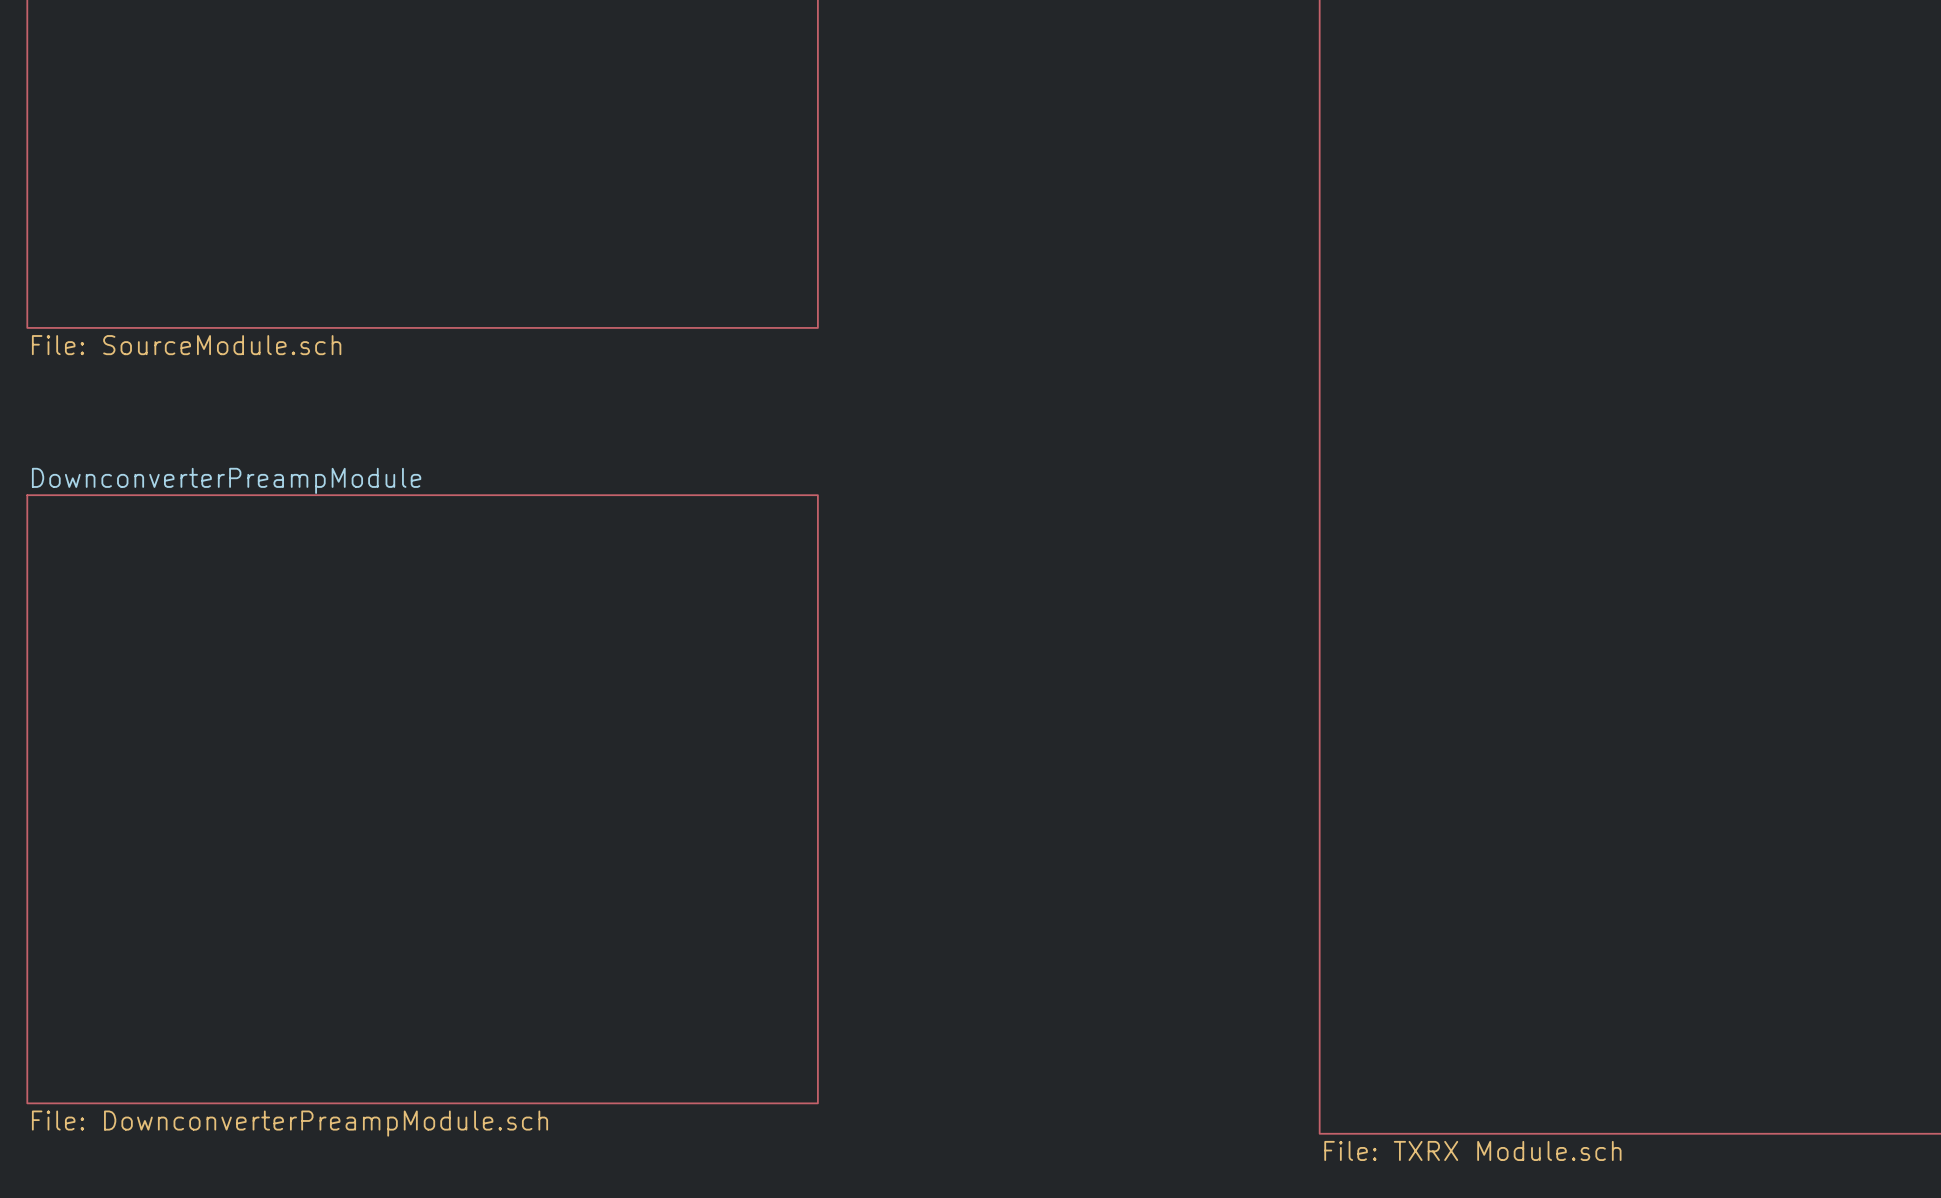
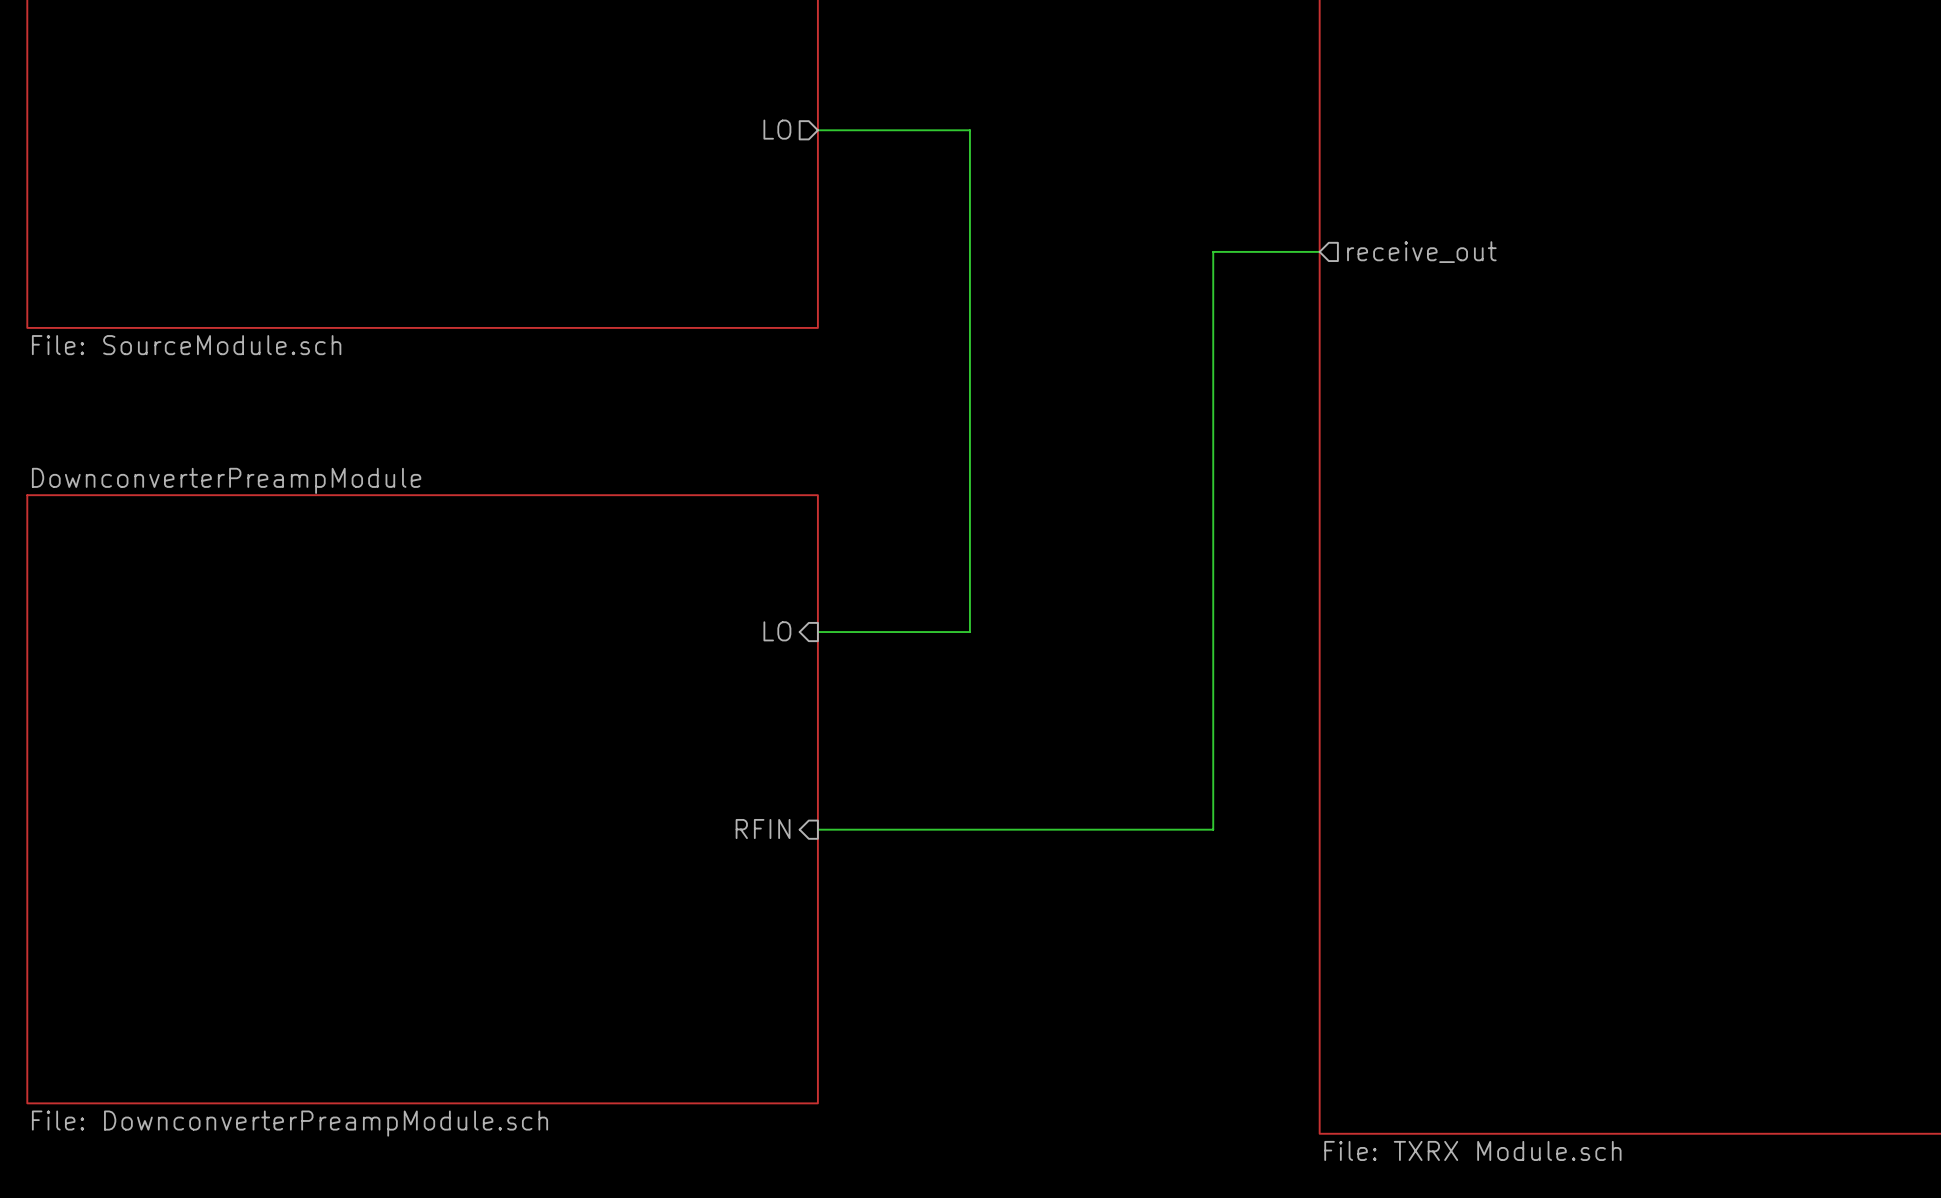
sheet pin: none -> LO (777, 129)
wire: none -> (817, 130) (969, 130) (969, 632) (817, 632)
wire: none -> (1319, 251) (1213, 251) (1213, 829) (817, 829)
sheet pin: none -> receive_out (1421, 252)
sheet pin: none -> LO (777, 631)
sheet pin: none -> RFIN (763, 829)

